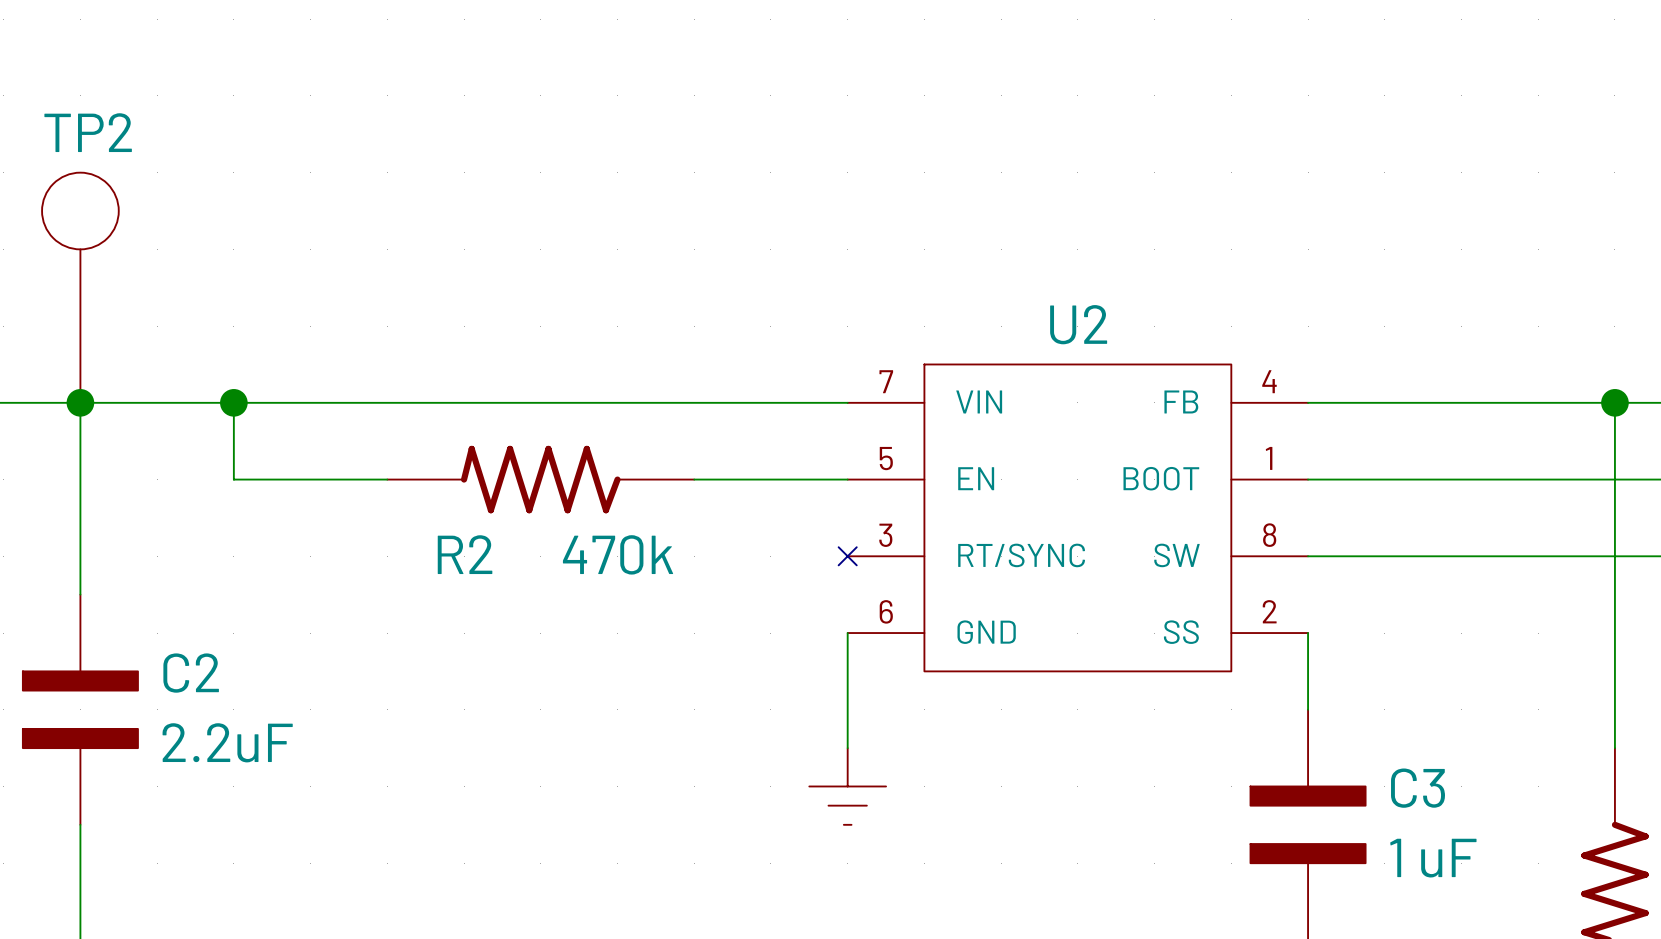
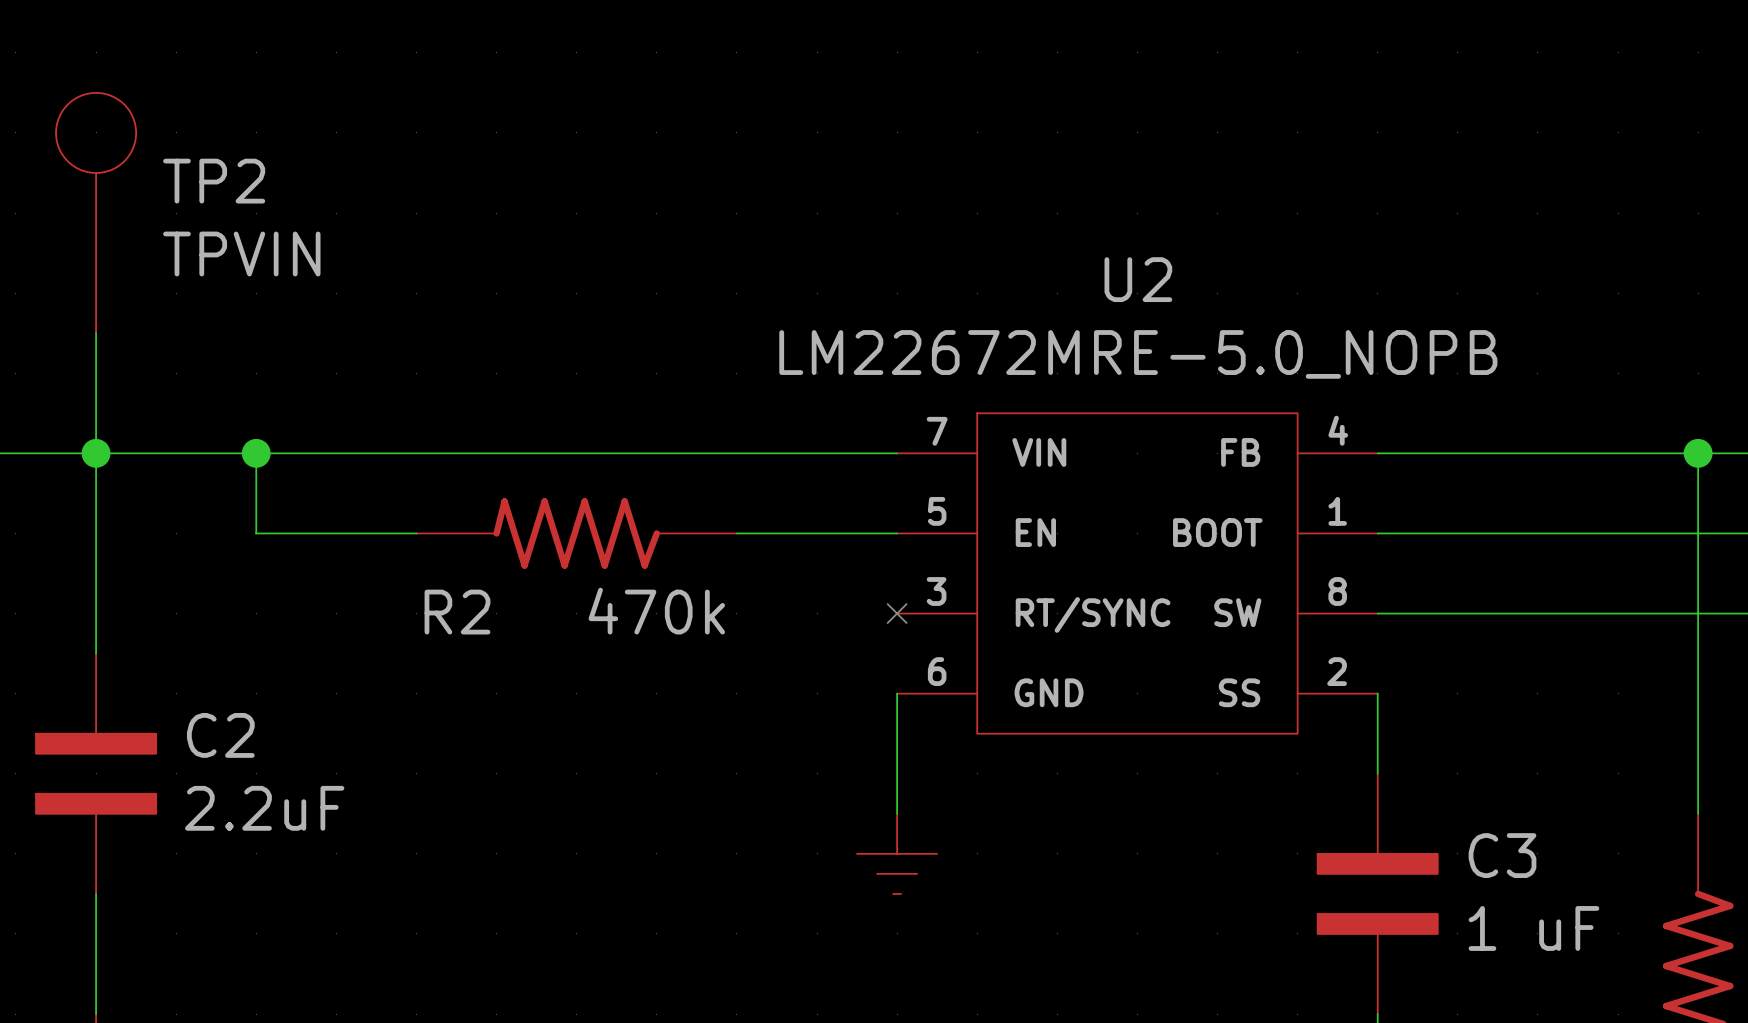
TP2 name position: TP2 (88, 132) -> TP2 (214, 181)
TP2 value: none -> TPVIN (241, 254)
TP2 position: (80, 287) -> (96, 213)
U2 value: none -> LM22672MRE-5.0_NOPB (1138, 354)
U2 name position: U2 (1078, 324) -> U2 (1138, 279)
R2 name position: R2 (465, 554) -> R2 (457, 612)

